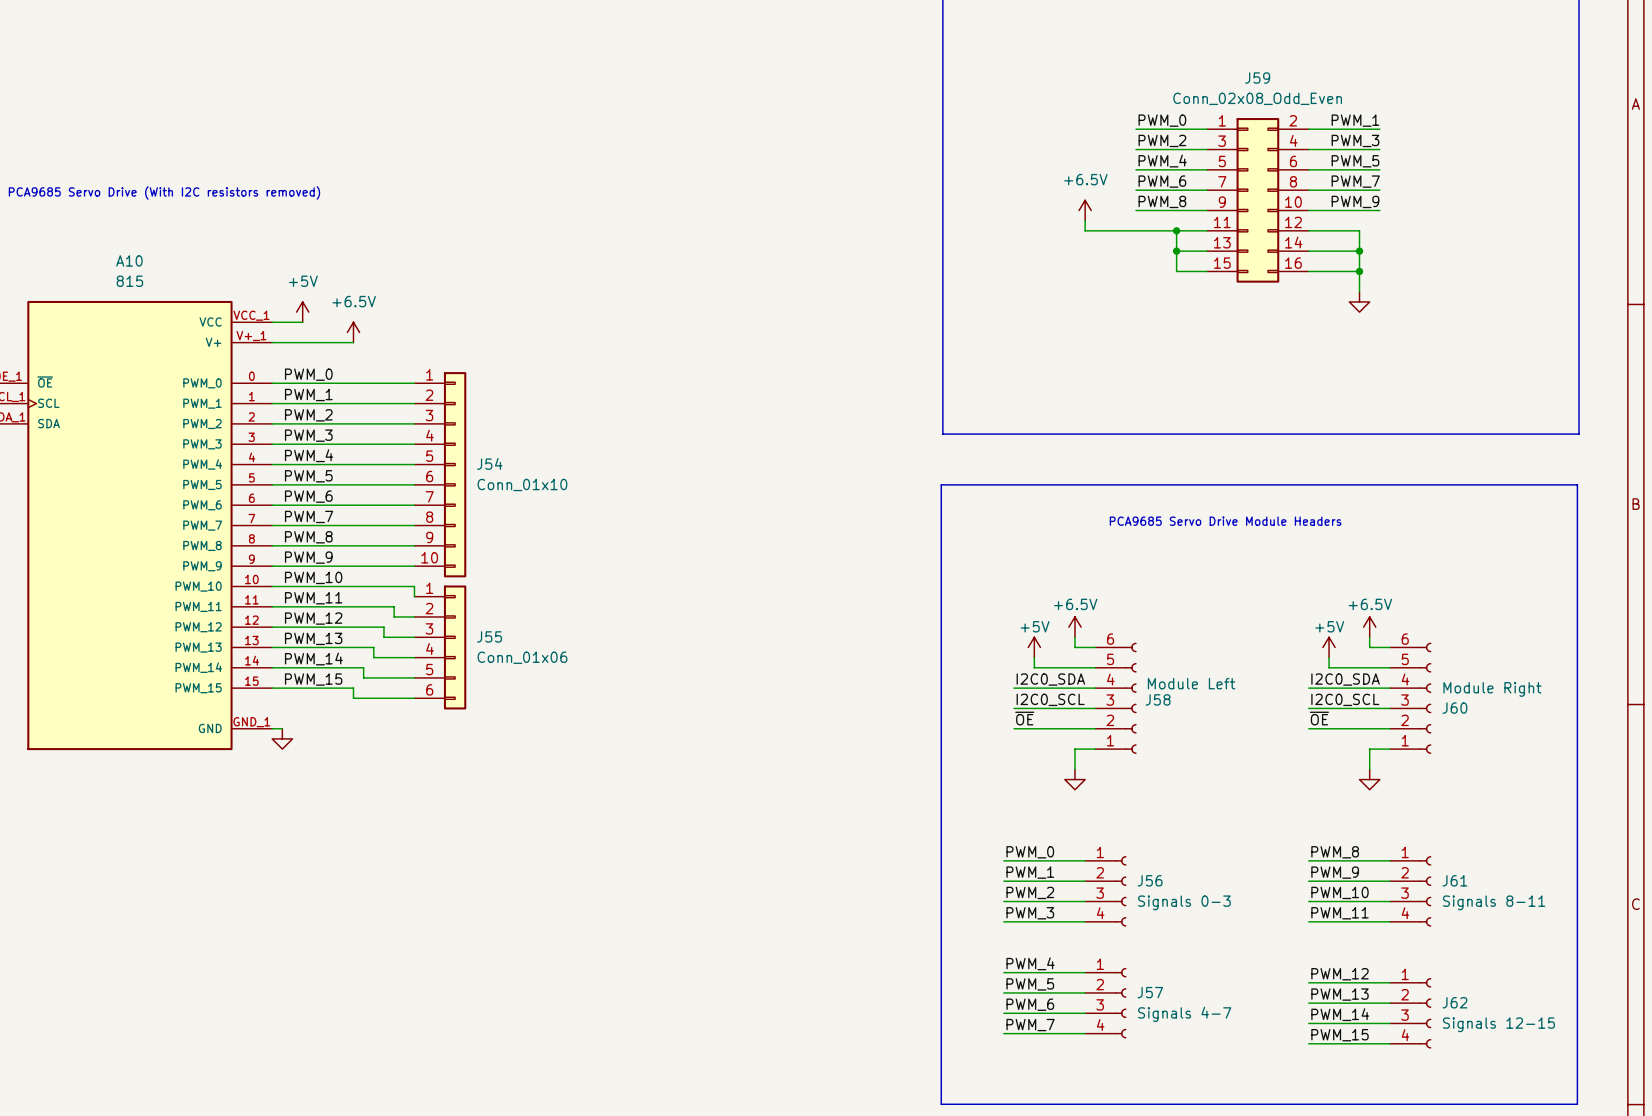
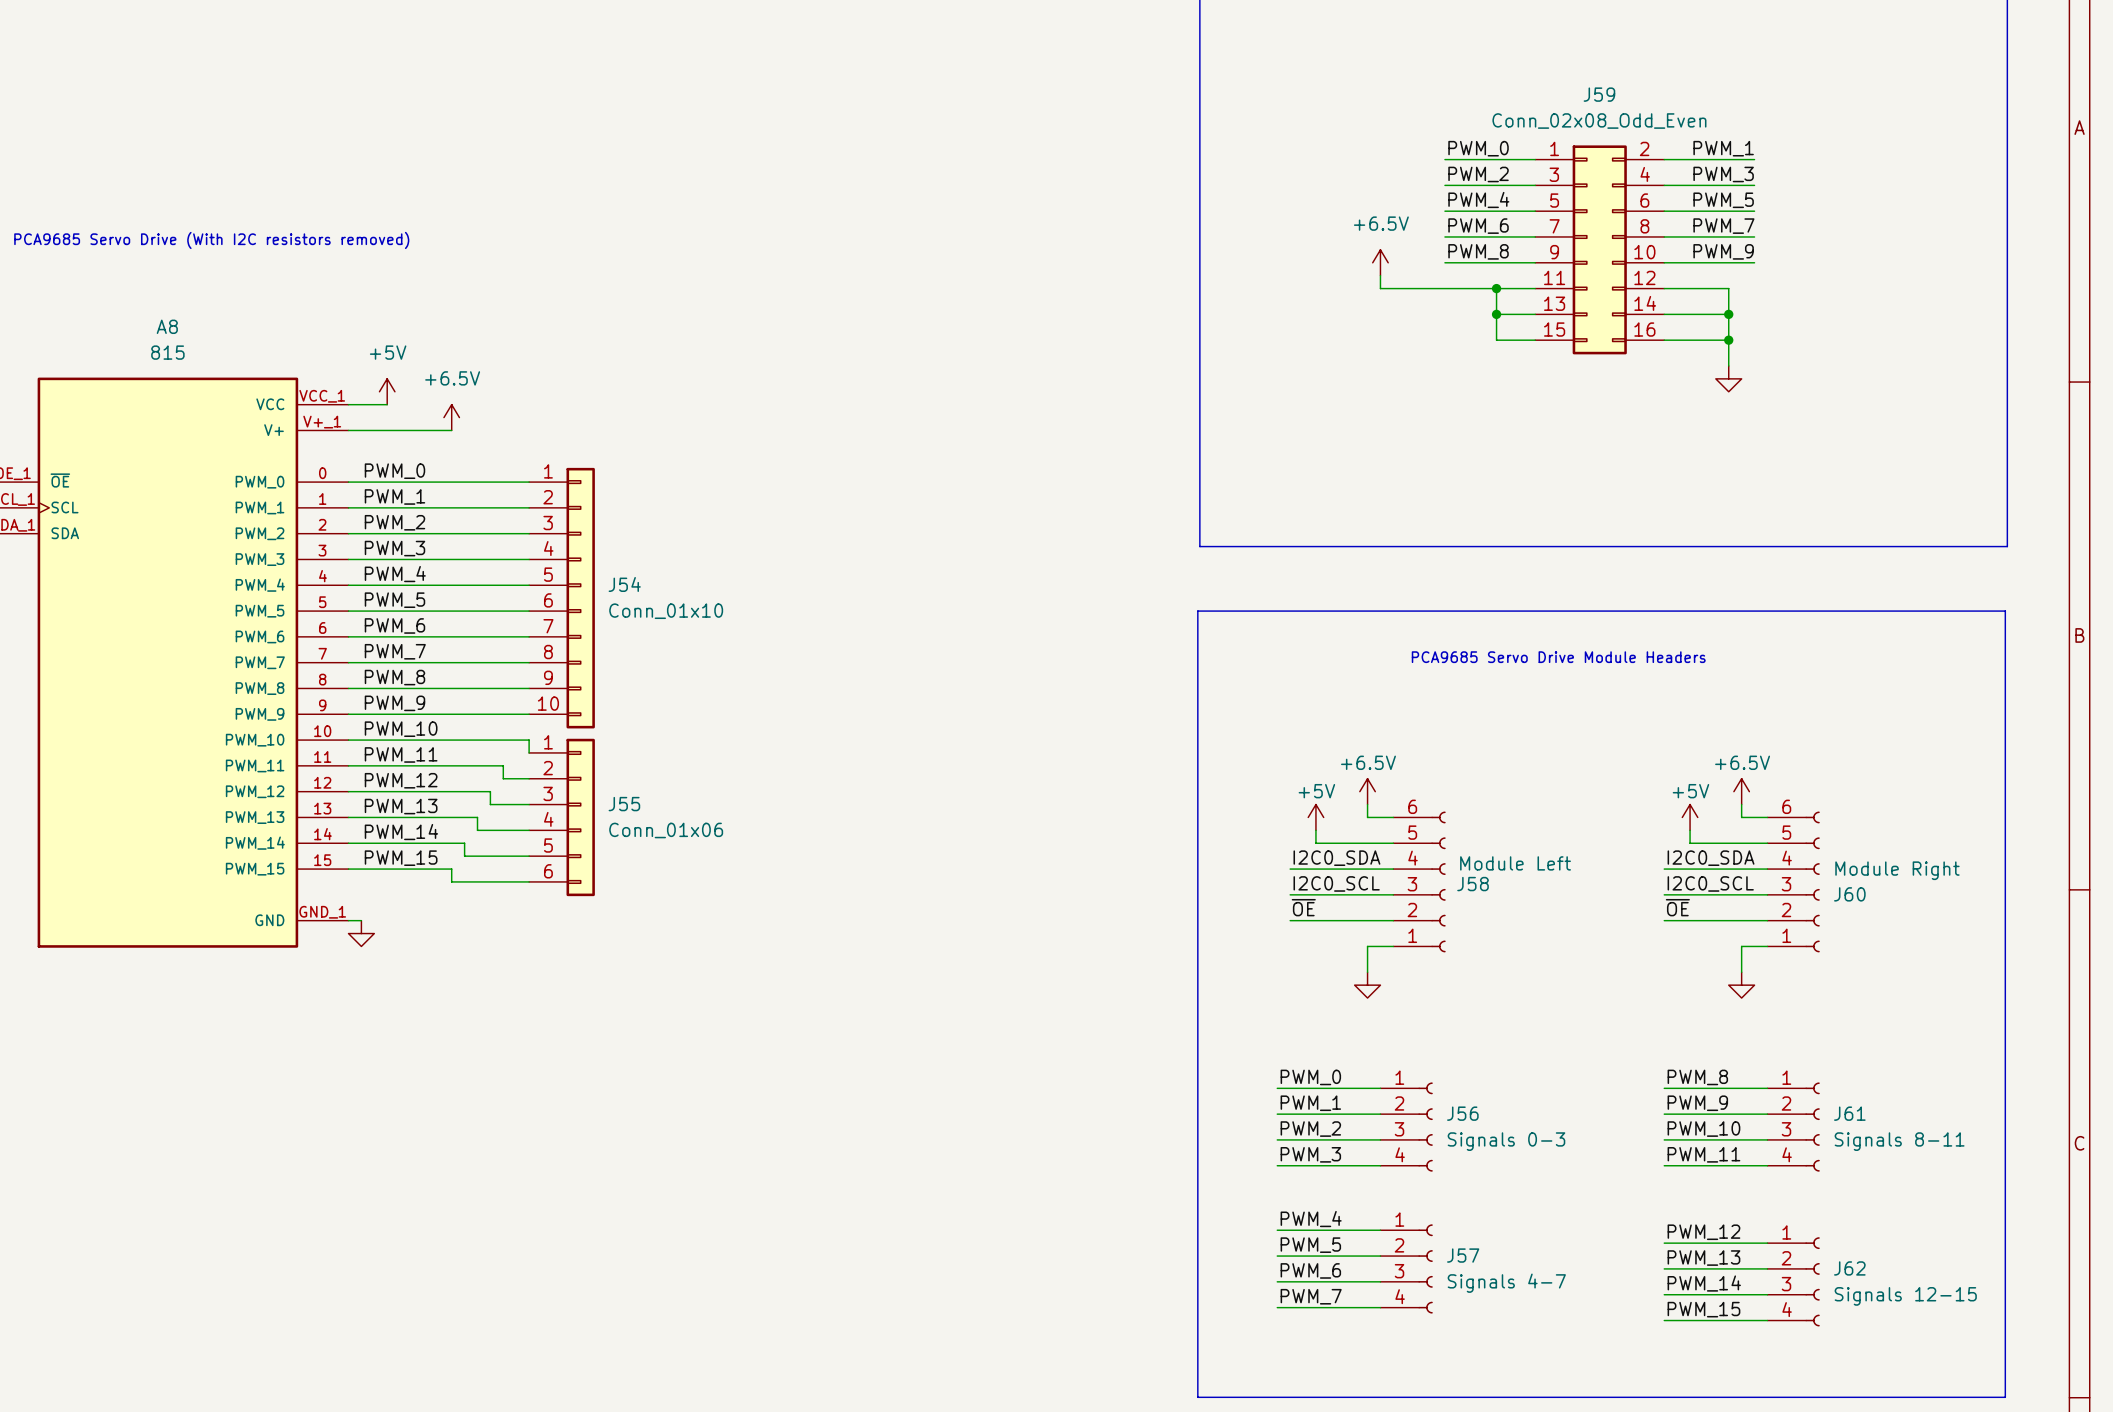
A10 name: A10 (129, 260) -> A8 (167, 326)

